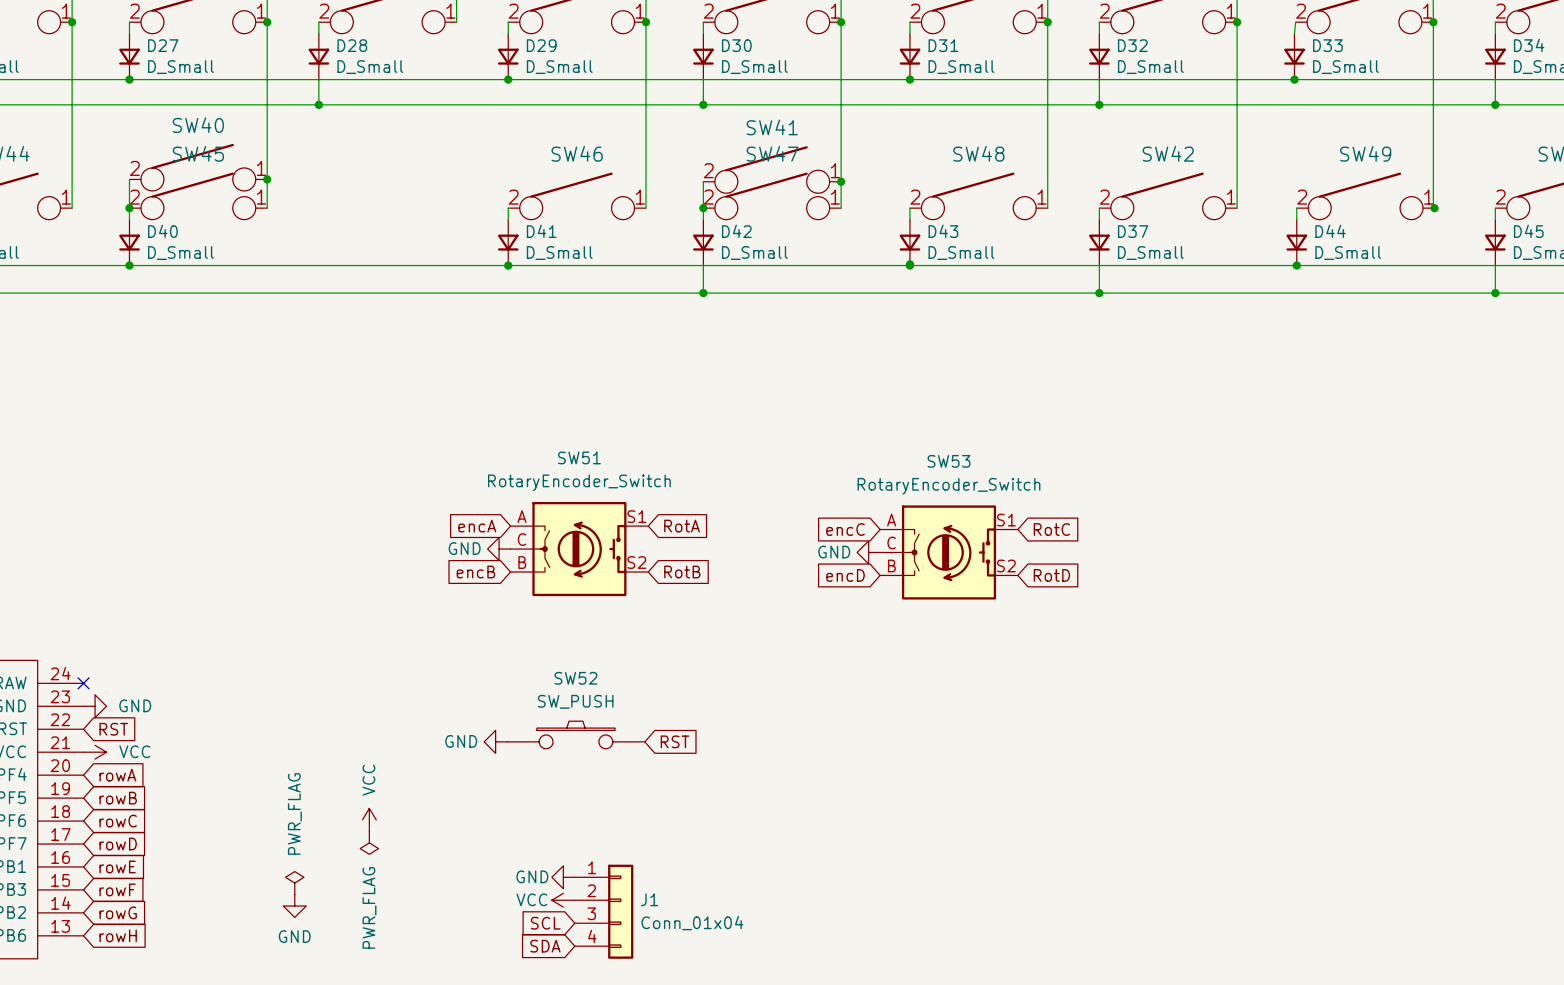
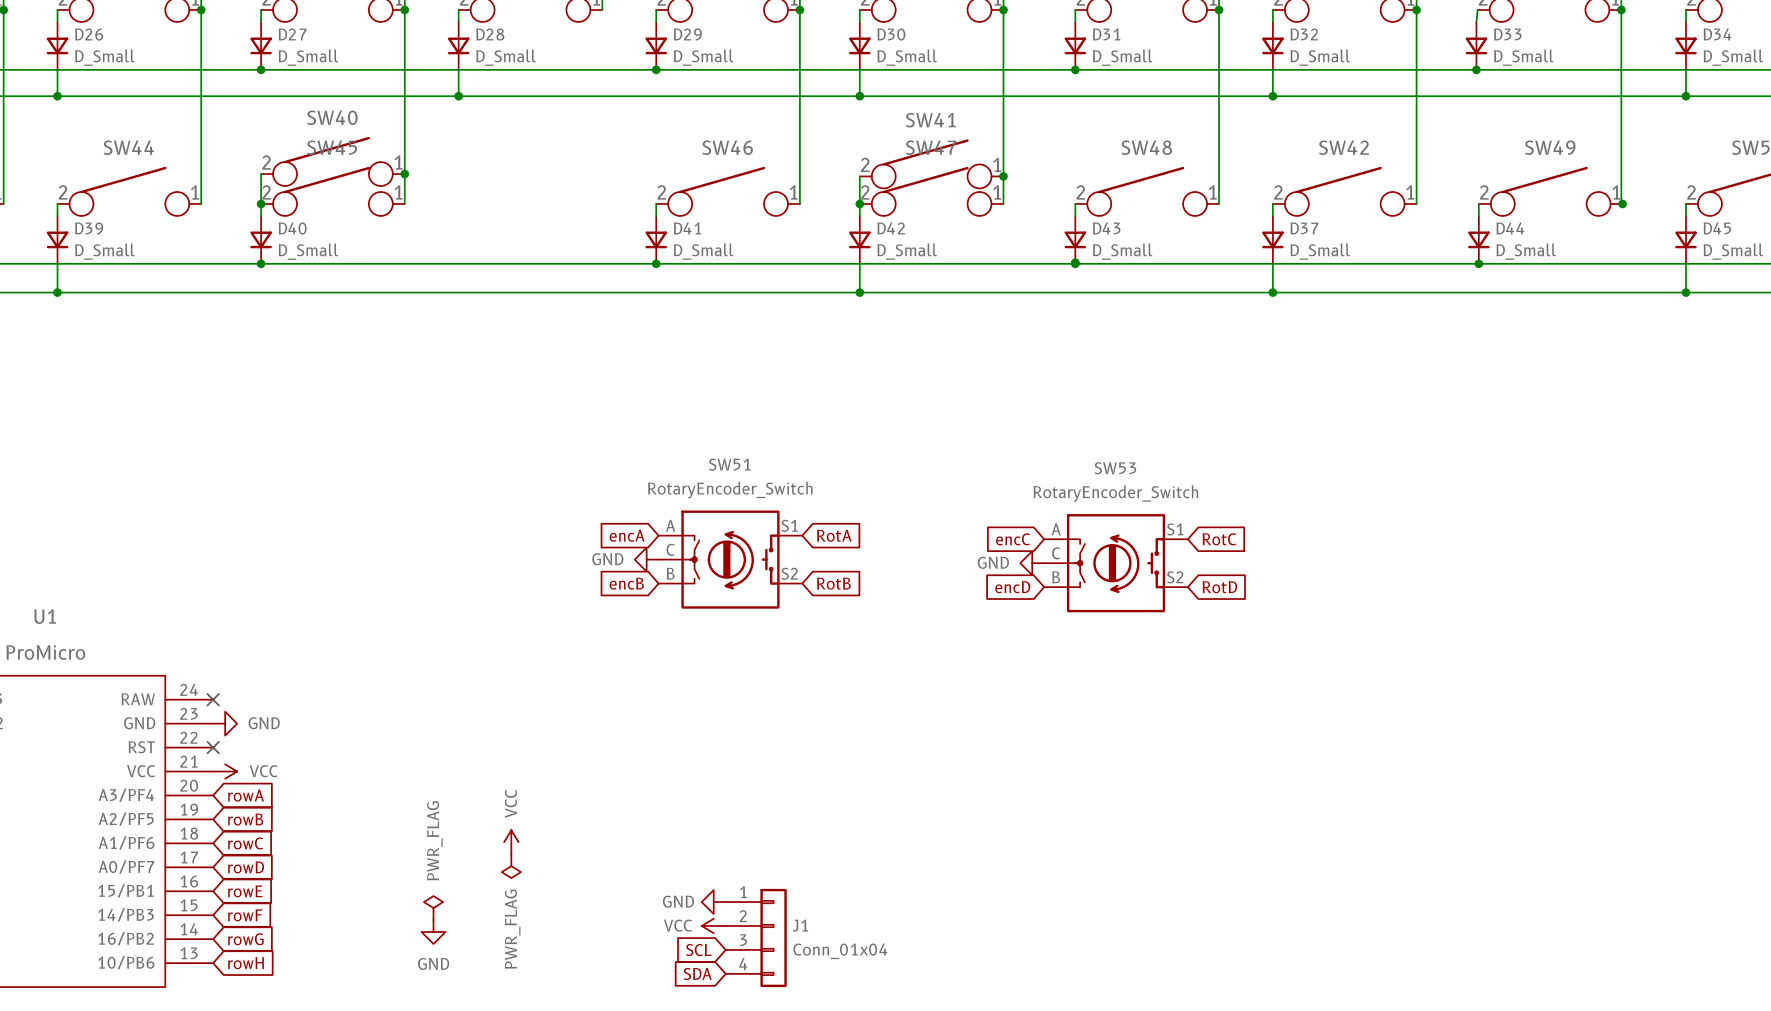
no-connect mark: none -> (213, 747)
global label: RST (113, 729) -> none
SW52: SW_PUSH (575, 734) -> none
power symbol: GND (495, 741) -> none
global label: RST (675, 741) -> none

